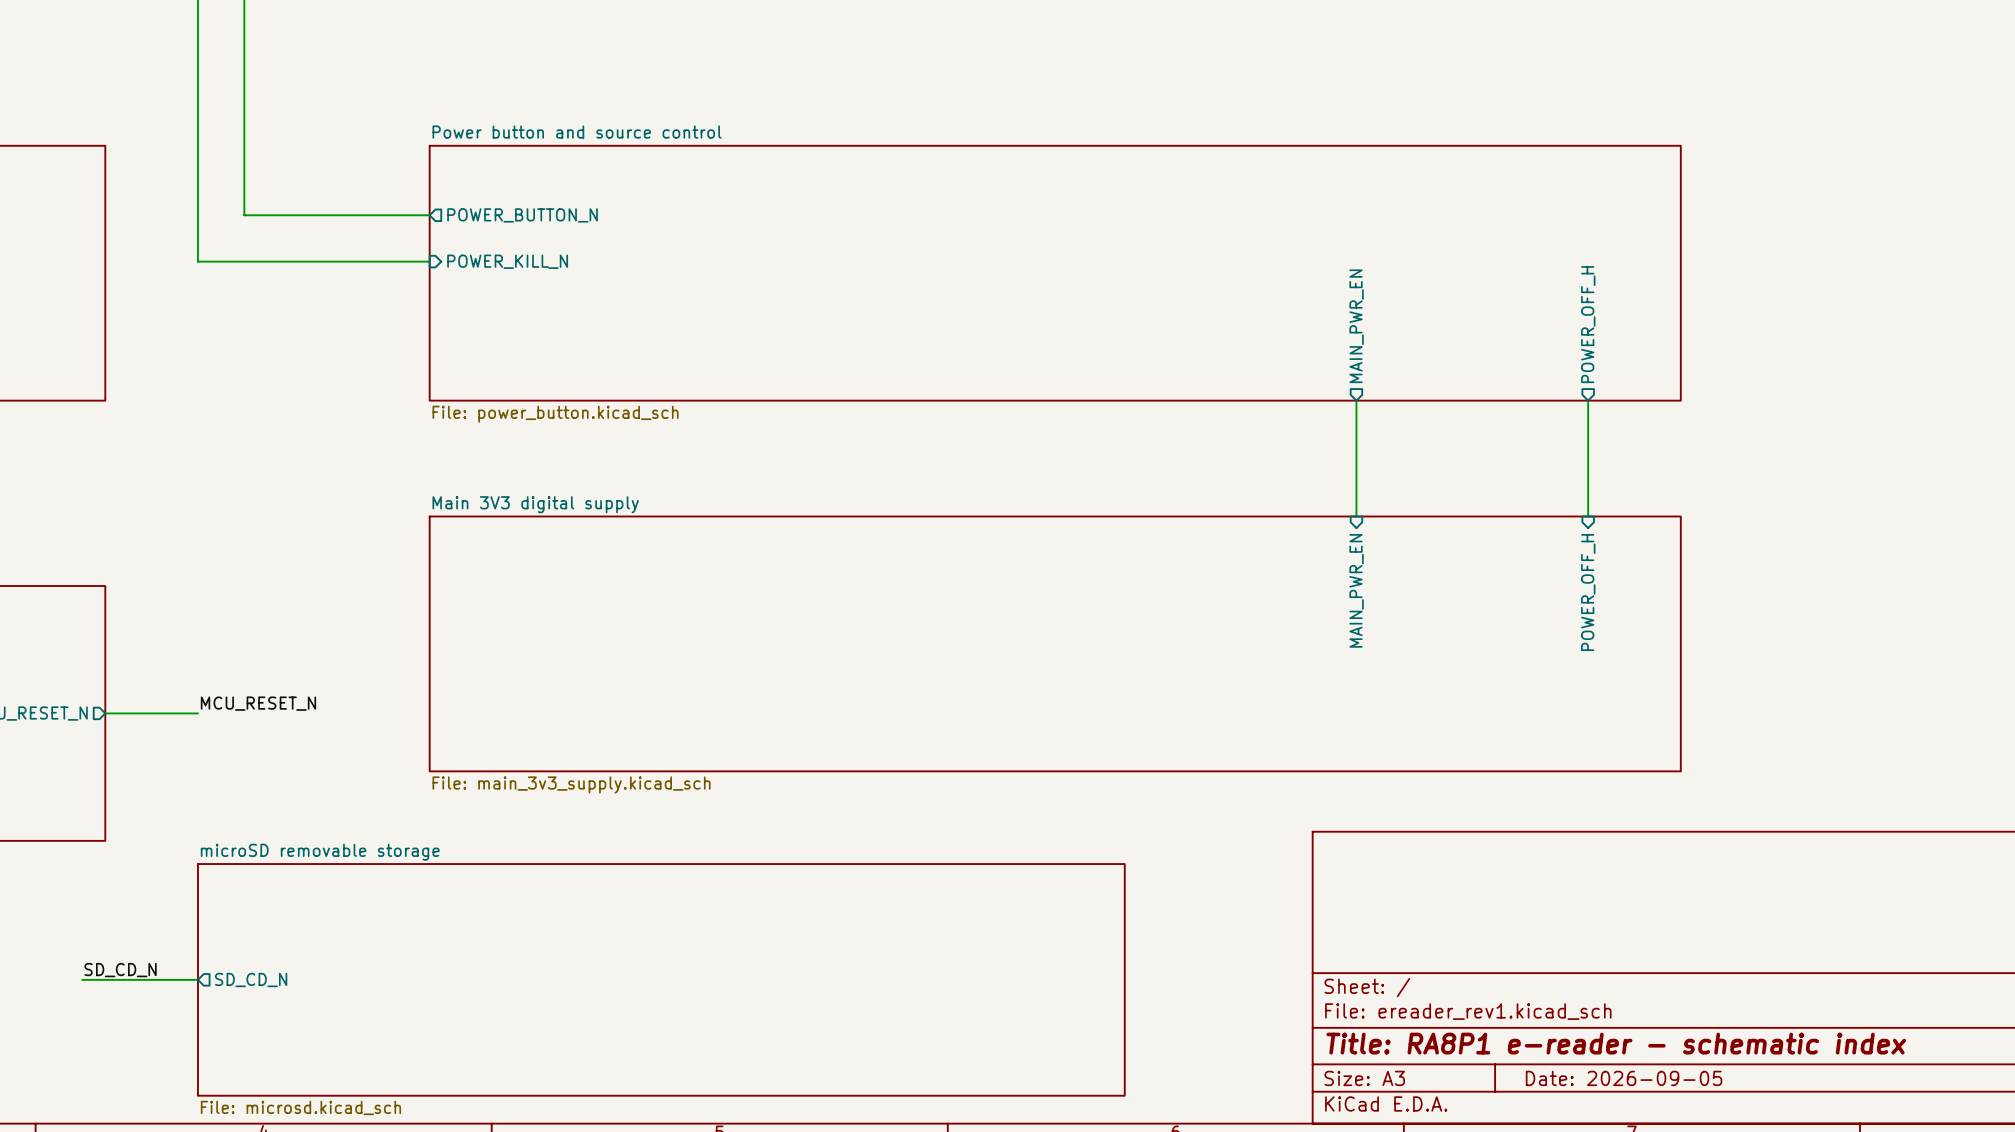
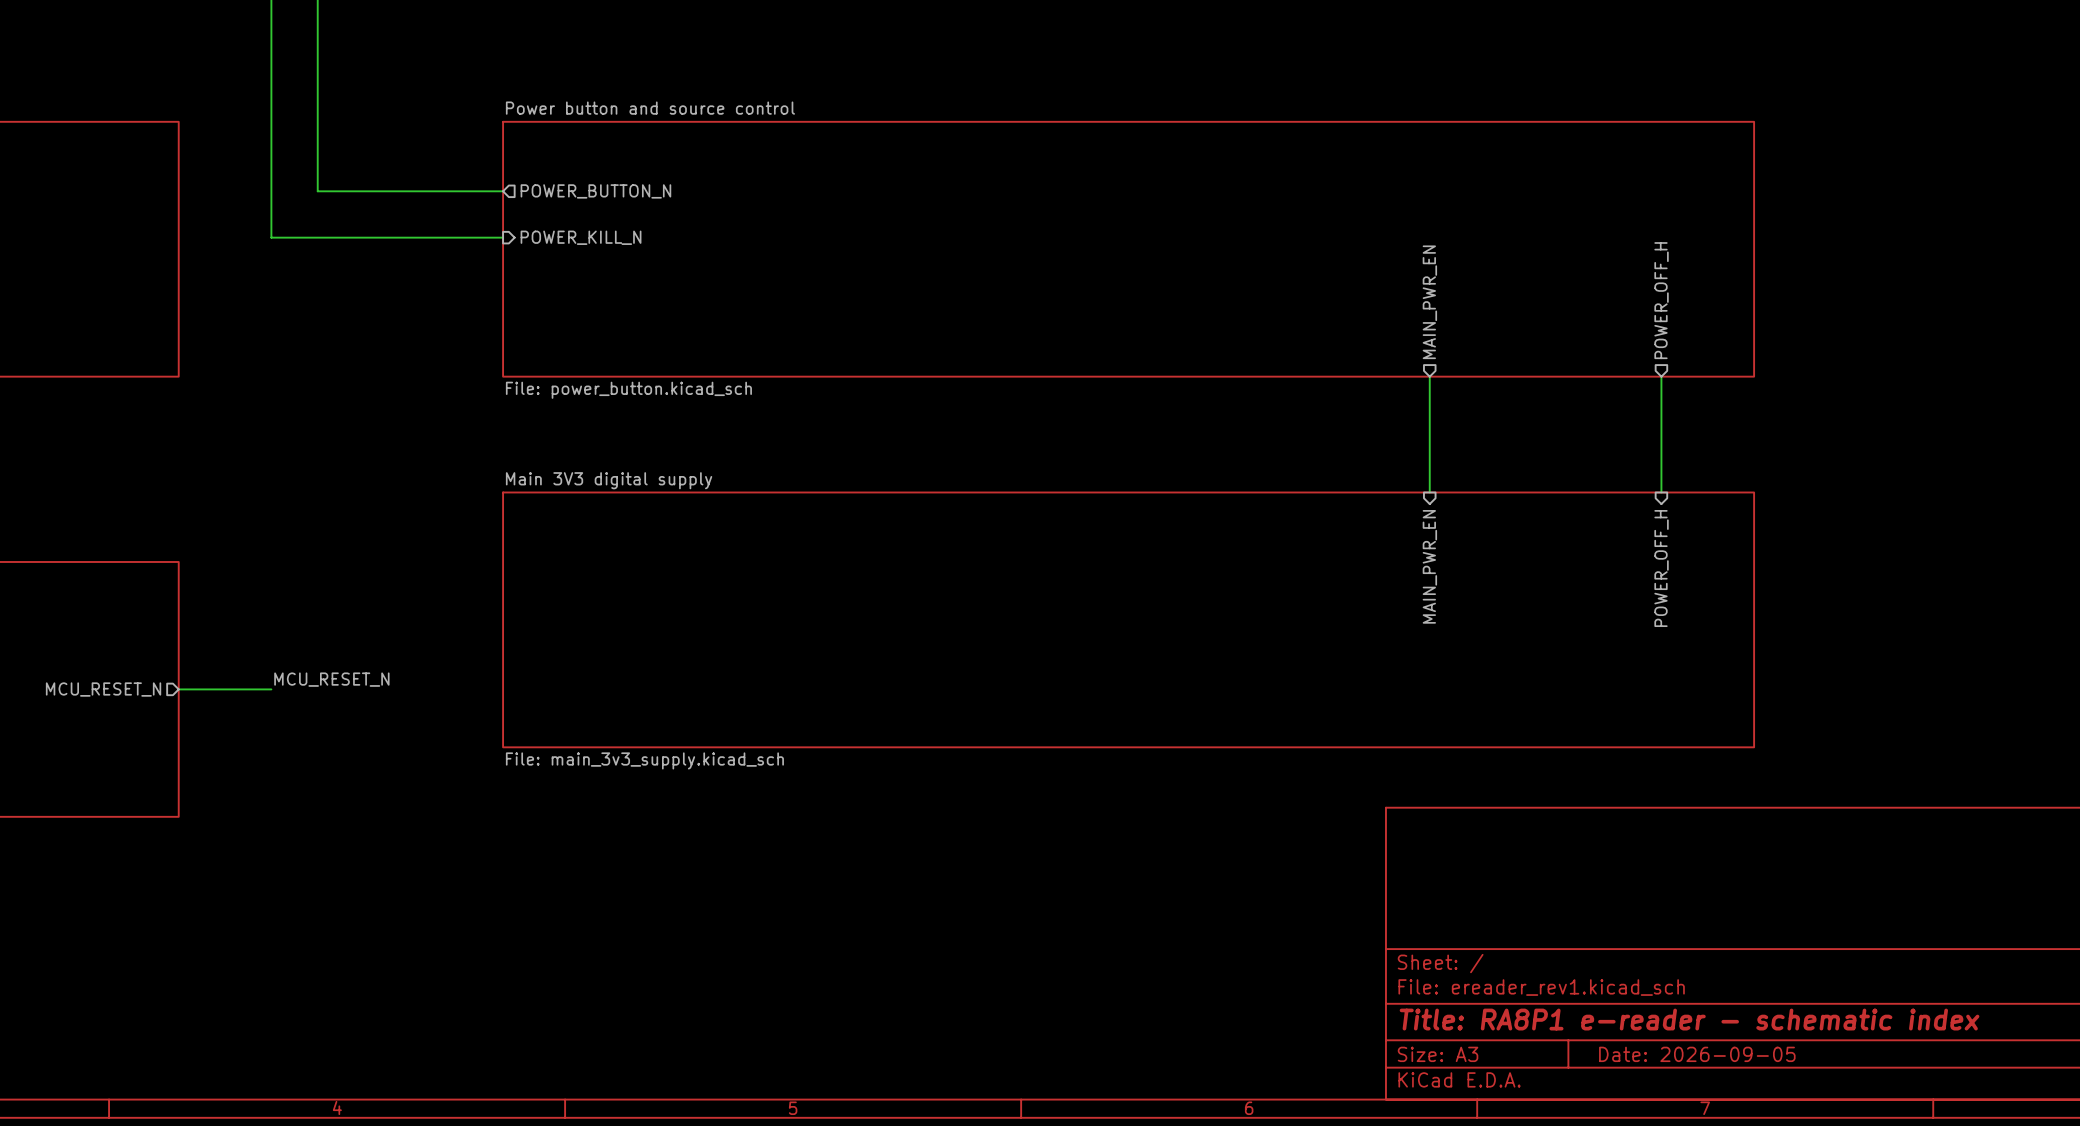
label: SD_CD_N (120, 970) -> none
wire: (82, 979) (197, 979) -> none
sheet pin: SD_CD_N (251, 979) -> none
sheet microSD removable storage: File: microsd.kicad_sch (661, 979) -> none

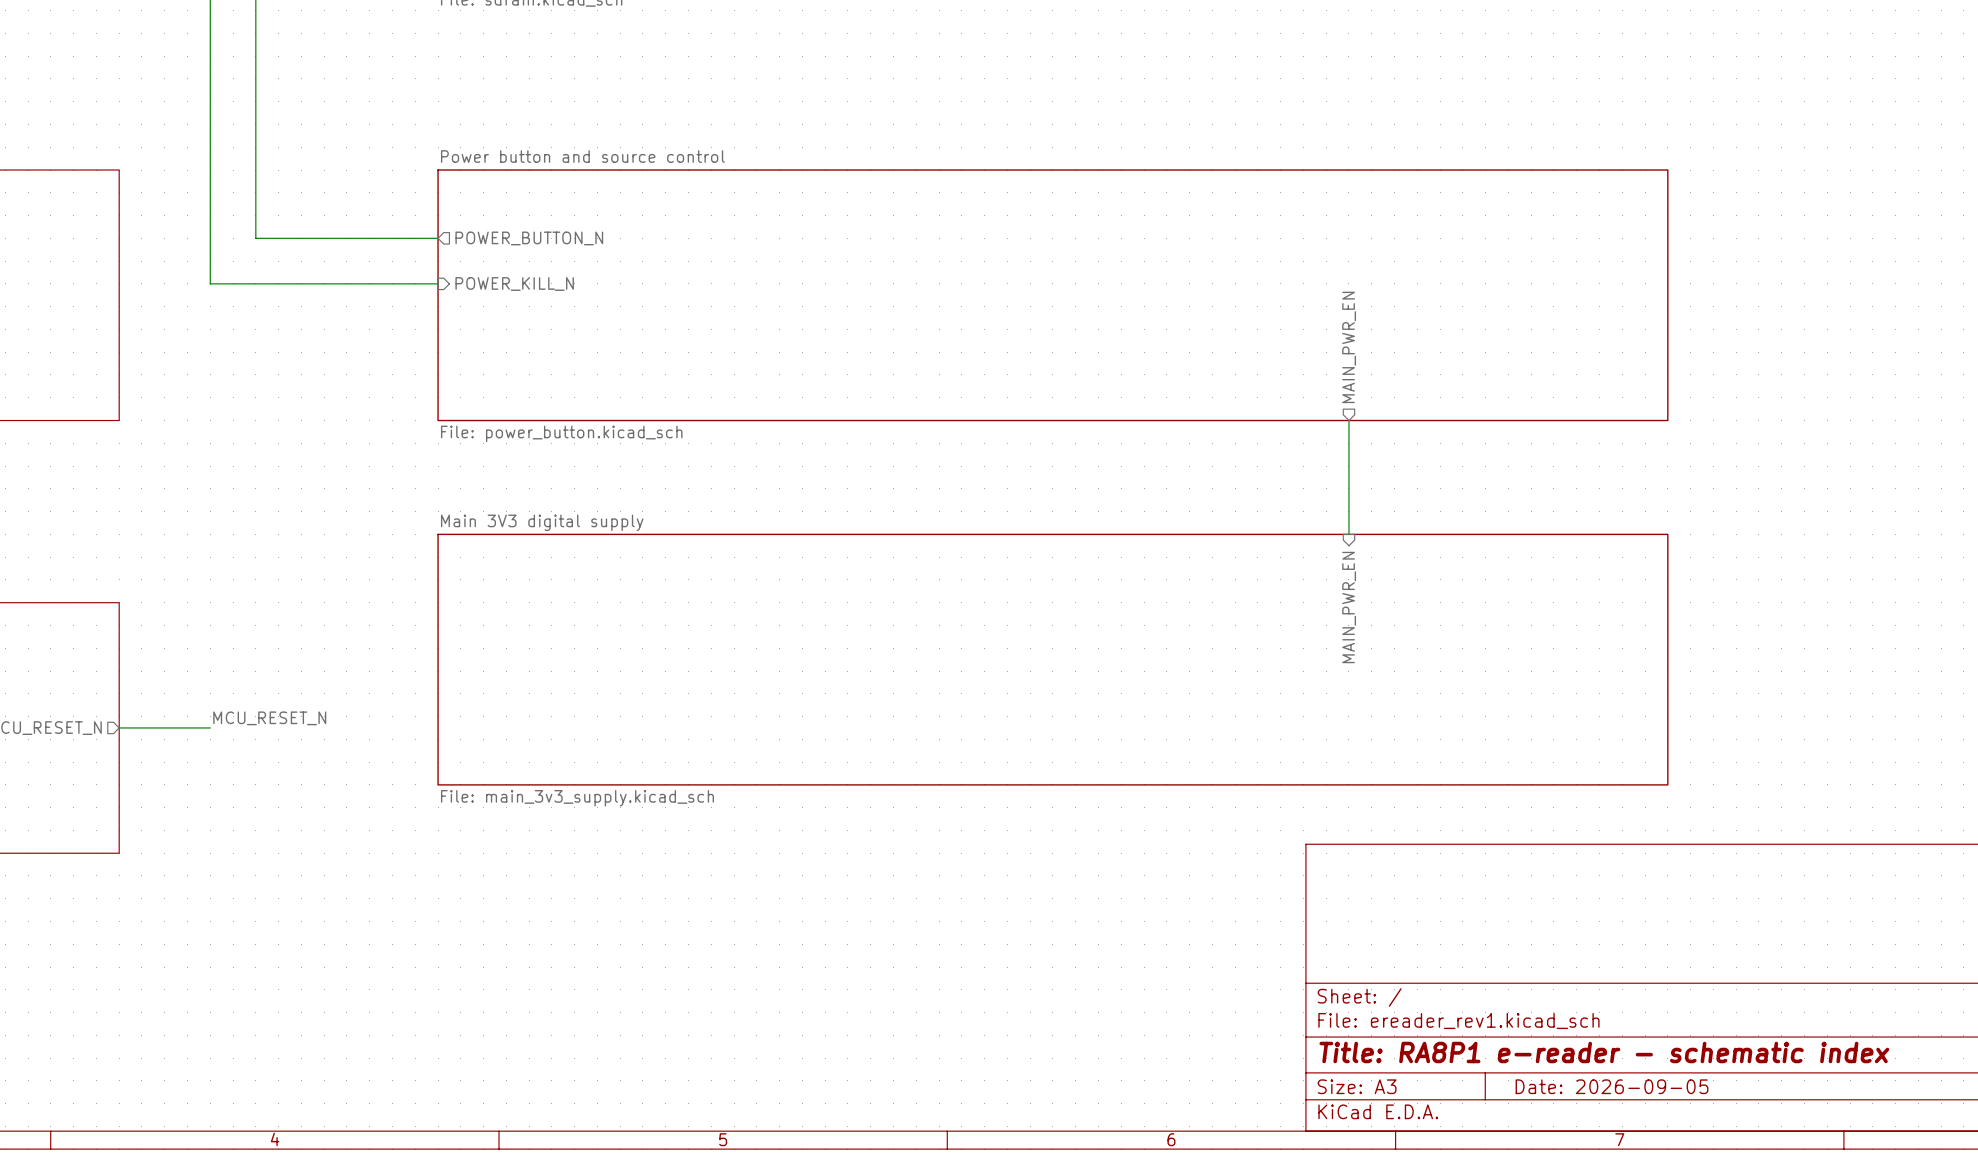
sheet pin: POWER_OFF_H (1661, 300) -> none
wire: (1661, 376) (1661, 492) -> none
sheet pin: POWER_OFF_H (1661, 568) -> none

